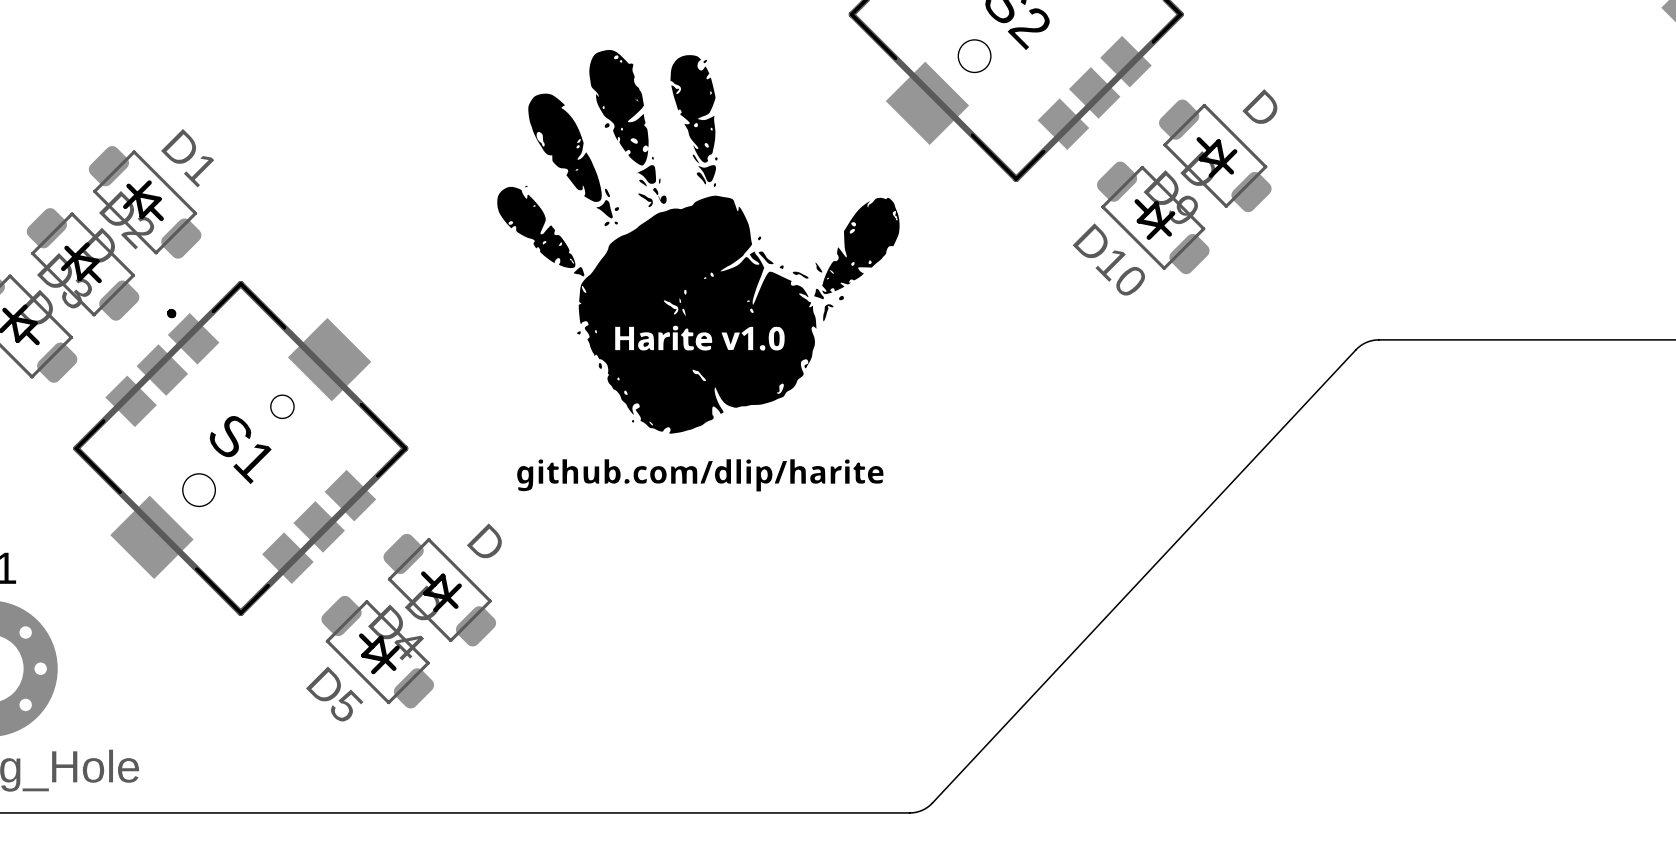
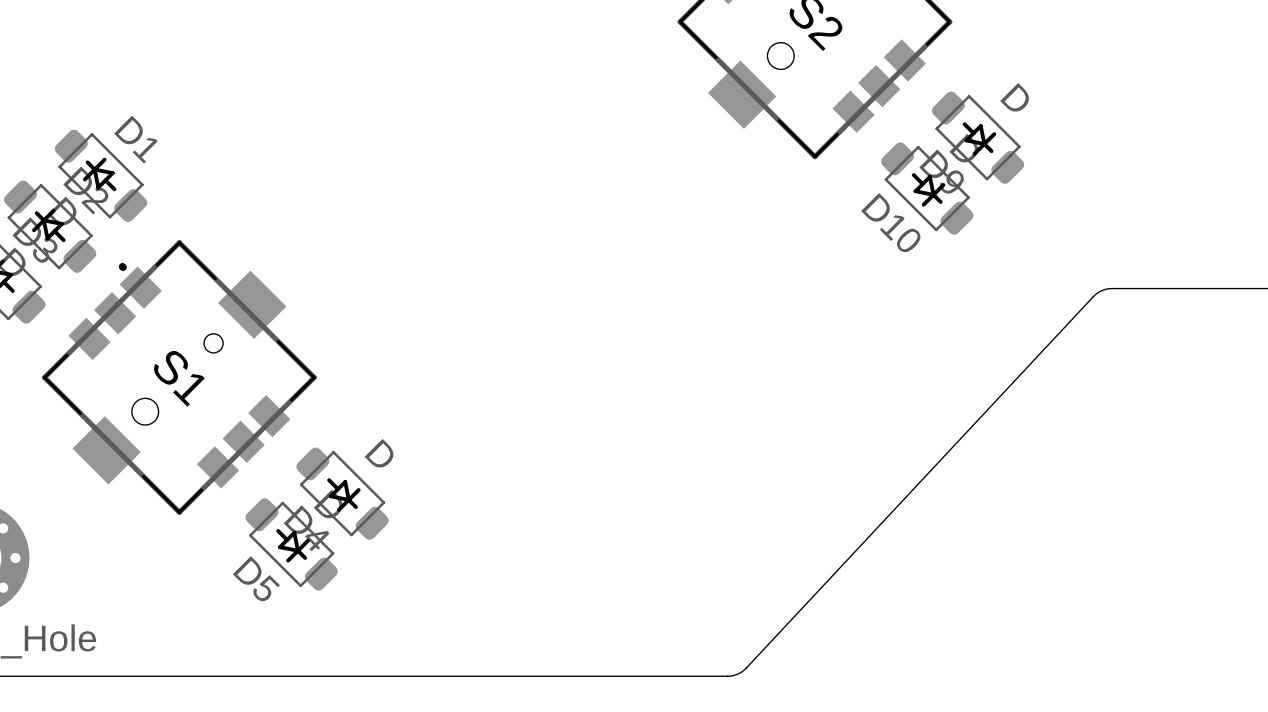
drawing: [497, 50, 900, 492] -> none

